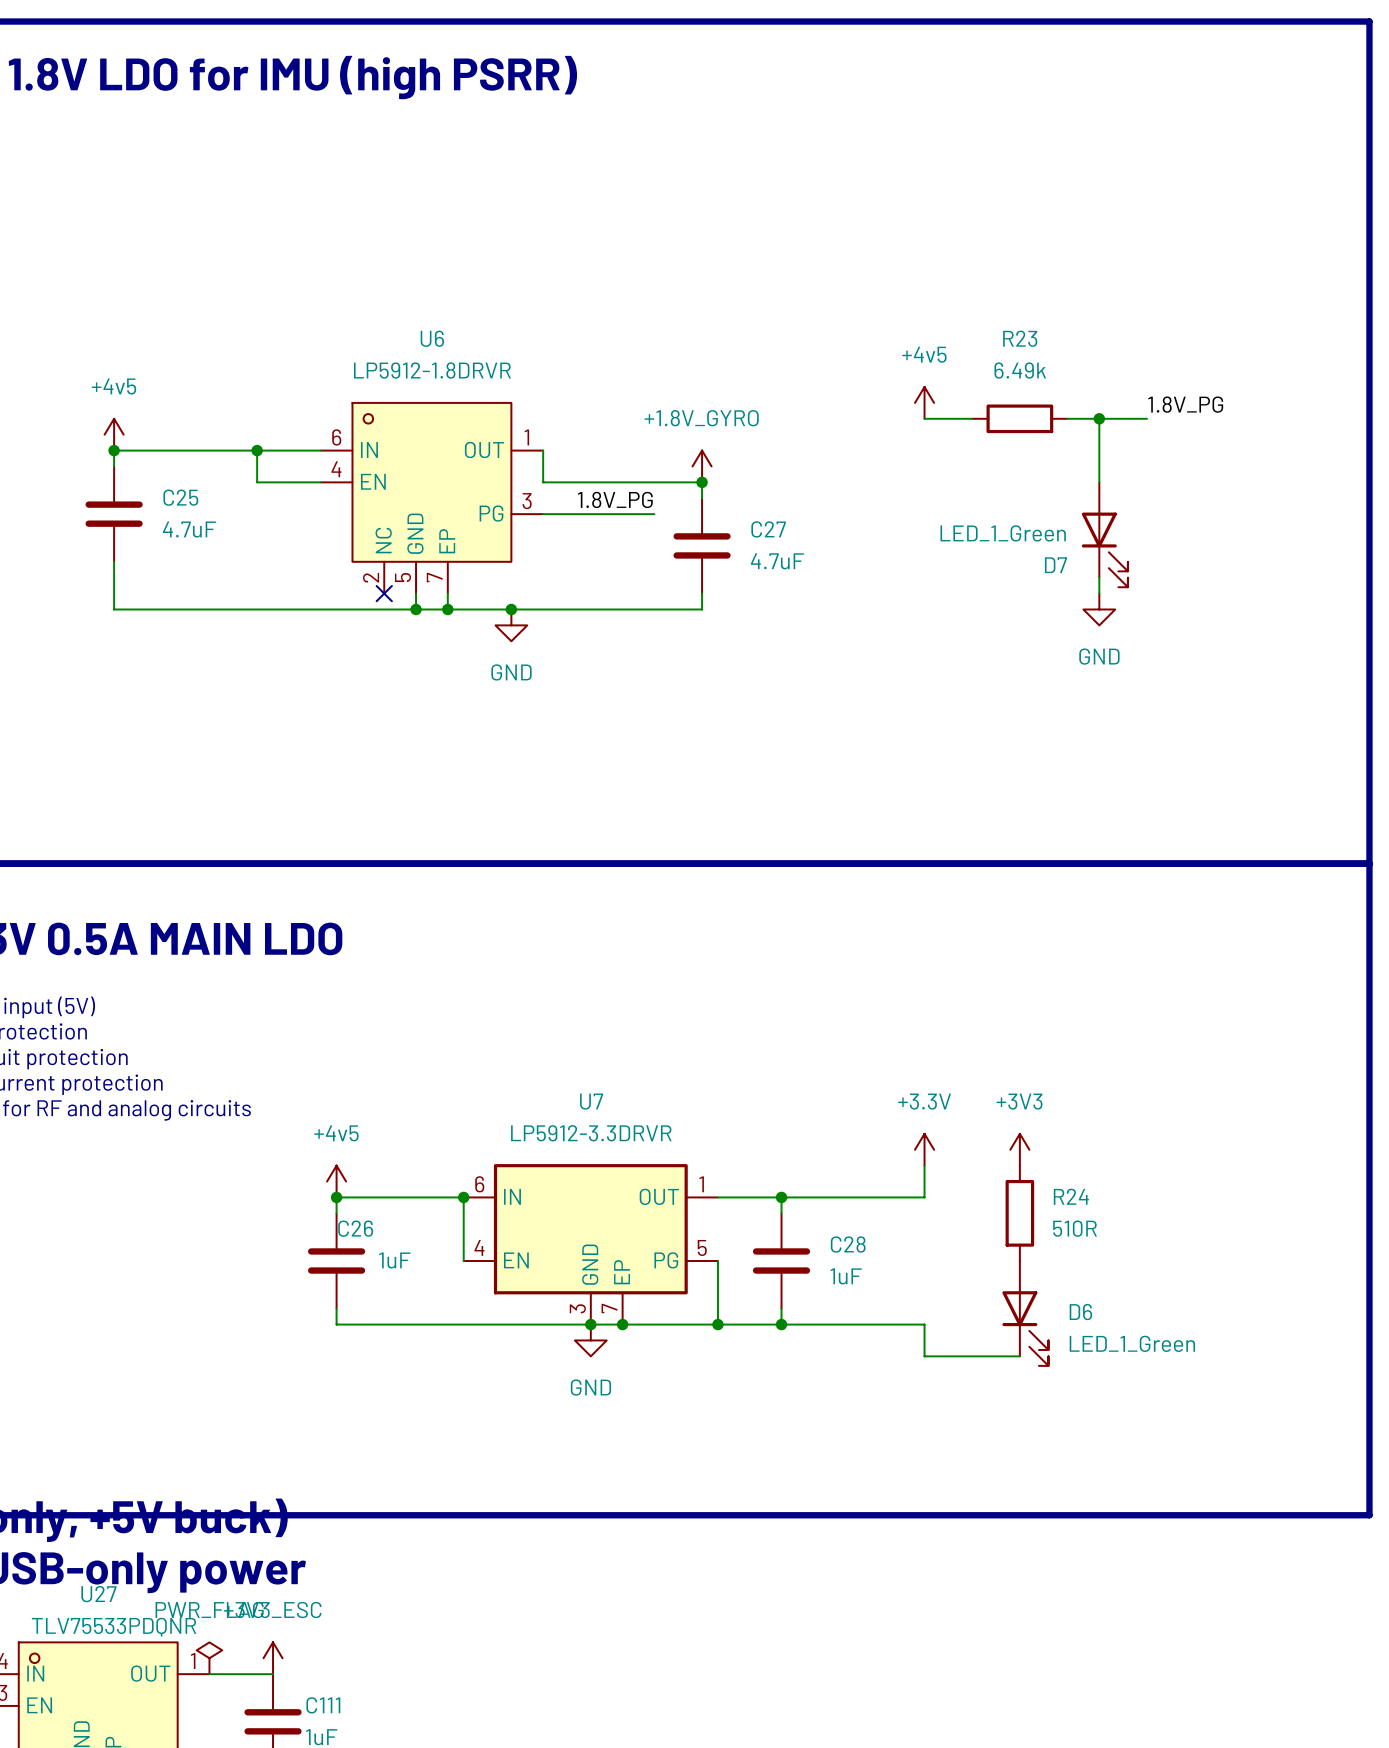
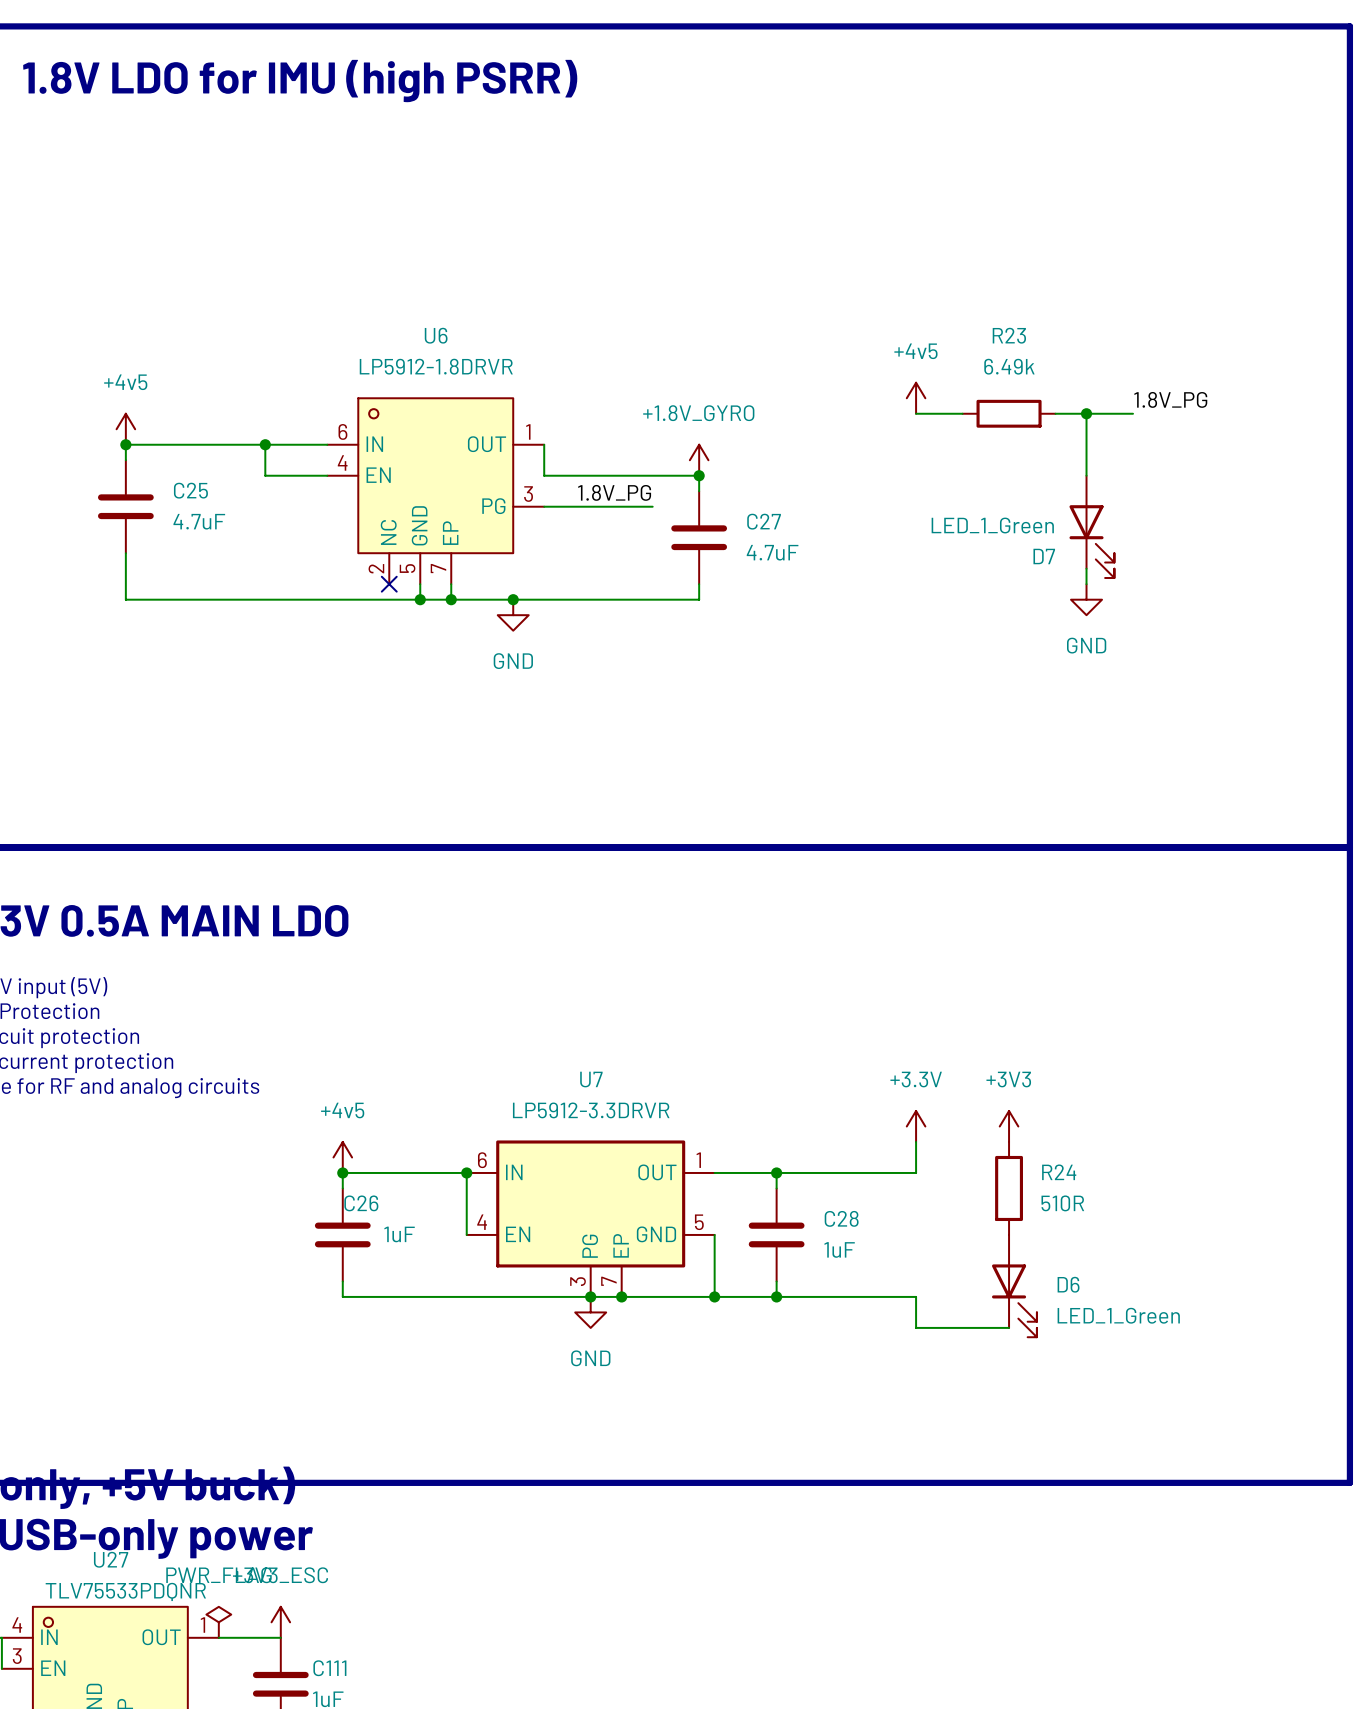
U7 pin name: PG (666, 1260) -> GND (656, 1234)
U7 pin name: GND (590, 1264) -> PG (590, 1246)

